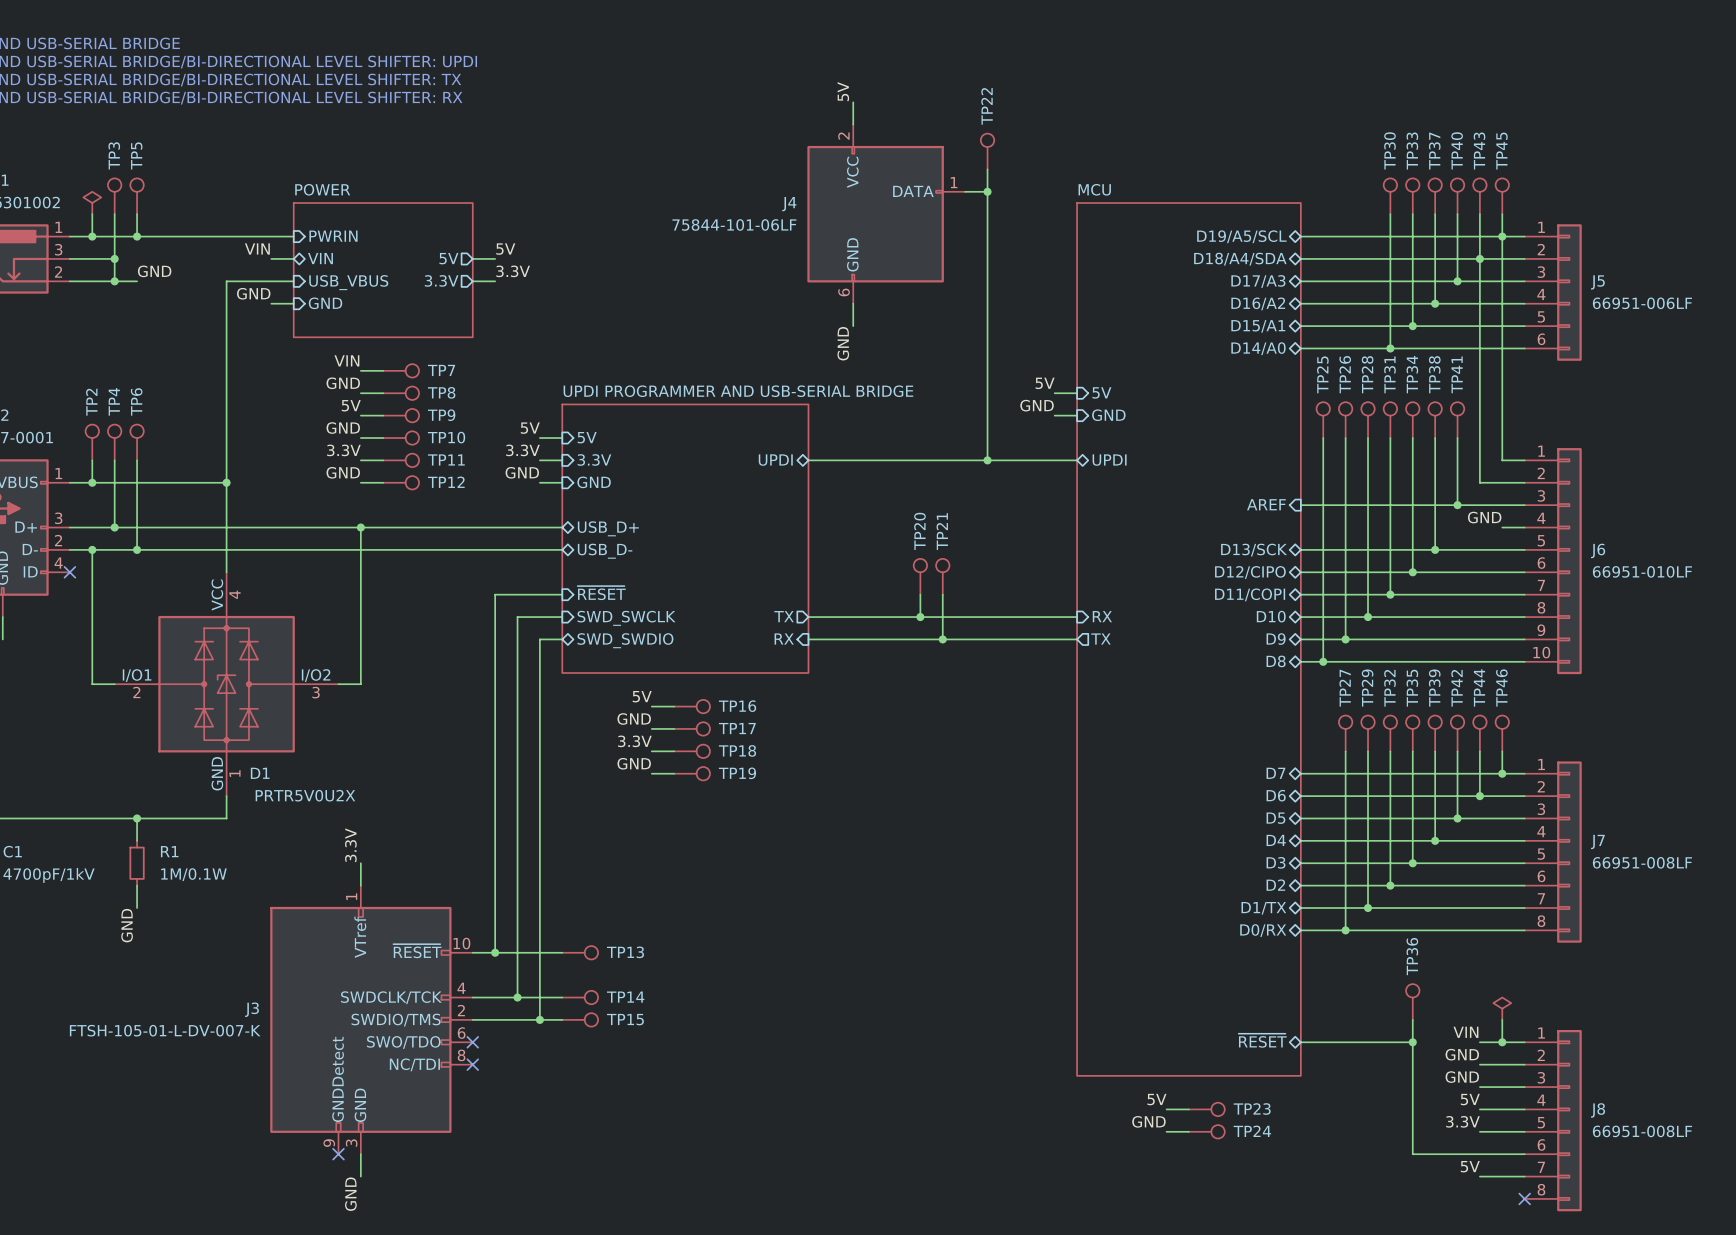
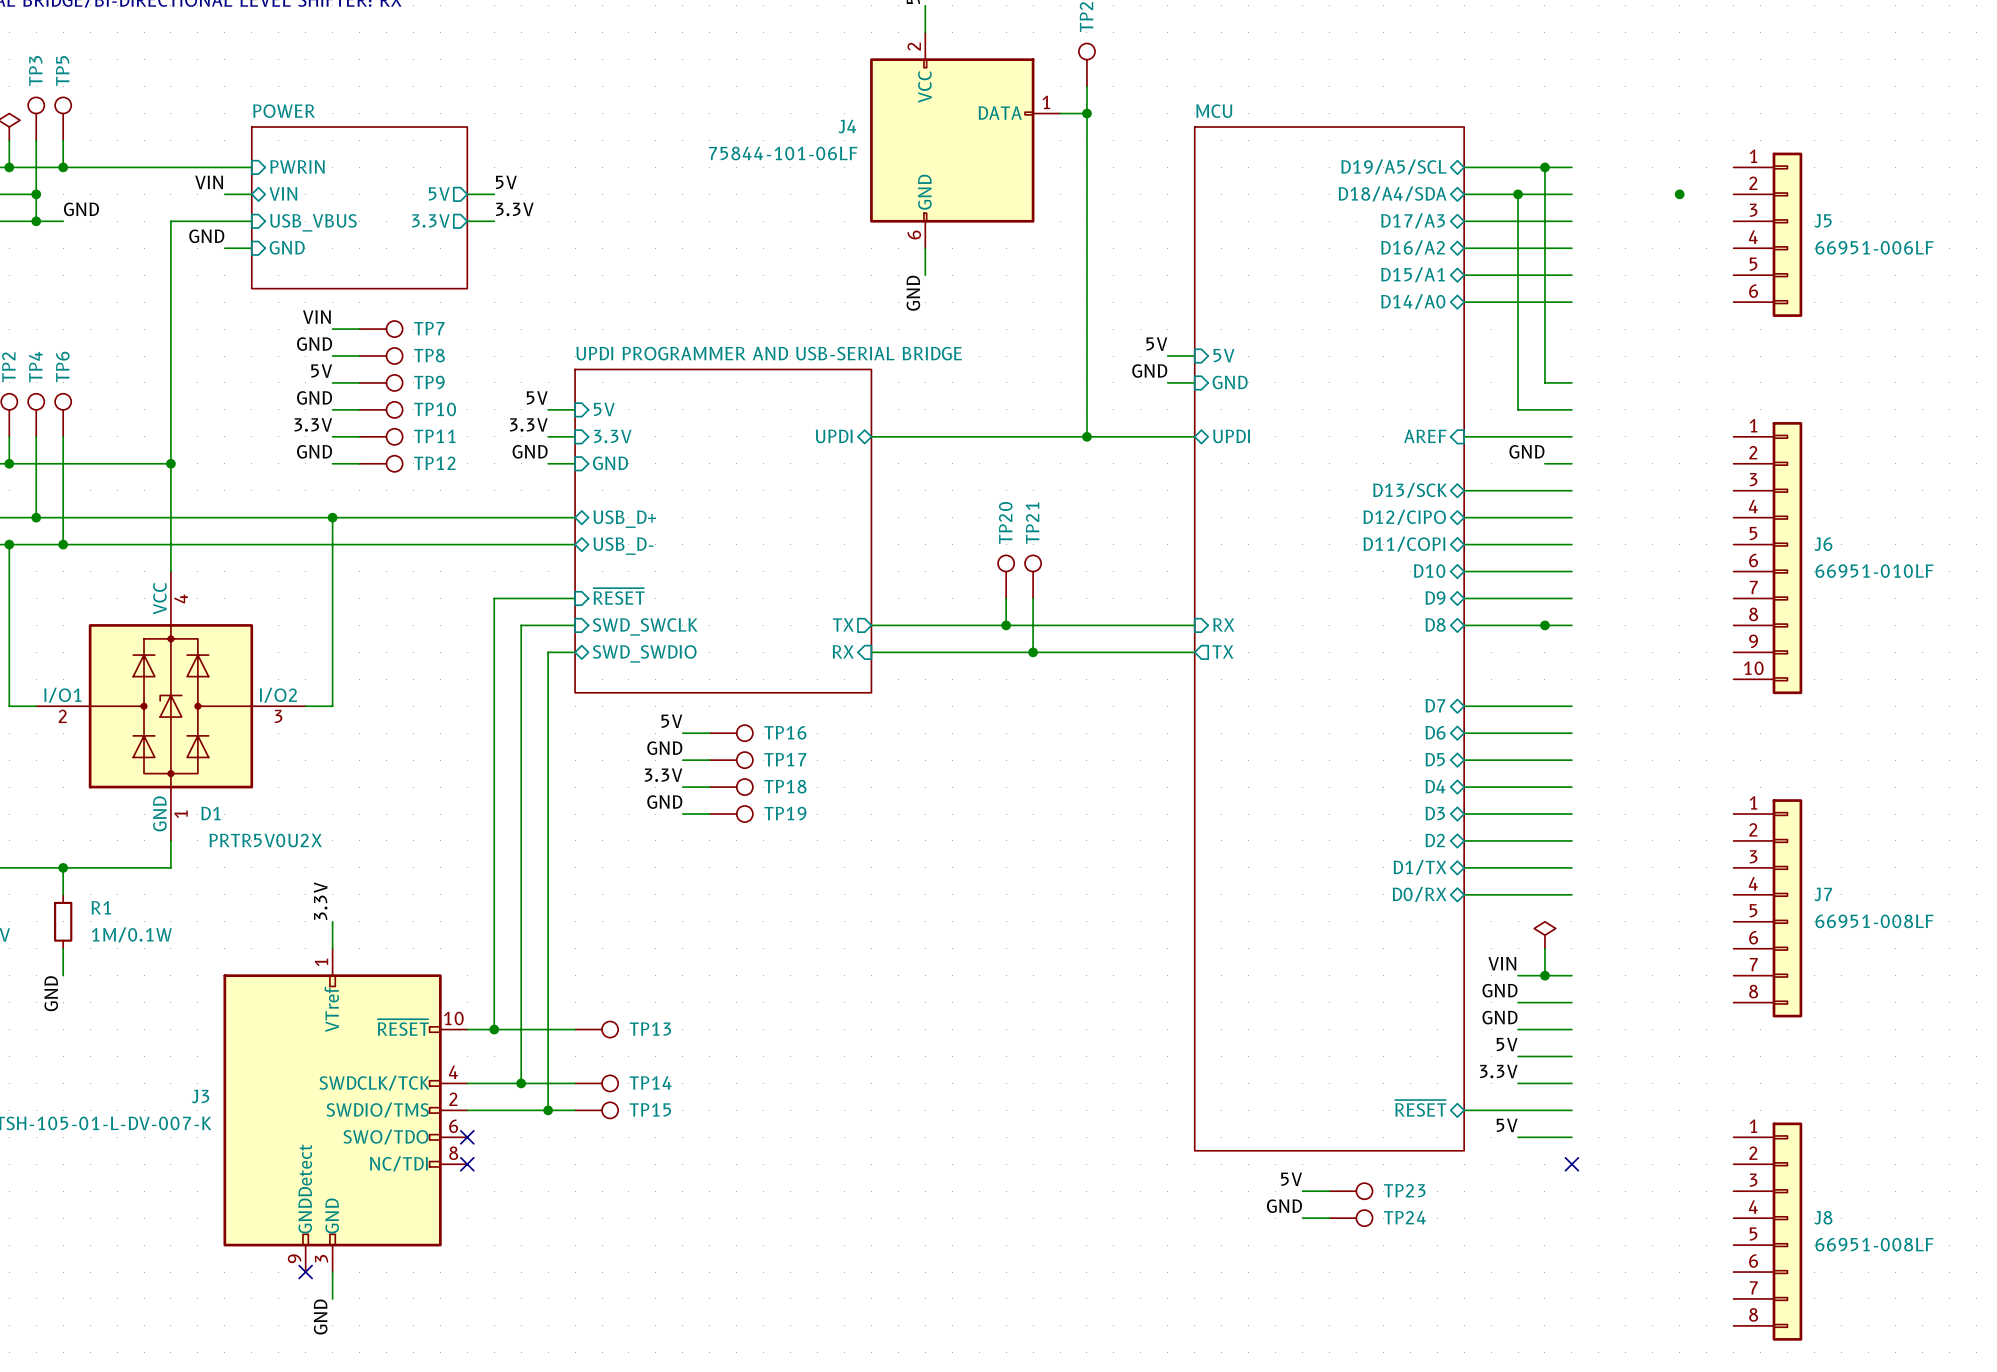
TP30: (1390, 196) -> none
TP33: (1412, 196) -> none
TP37: (1435, 196) -> none
TP40: (1457, 196) -> none
TP43: (1479, 196) -> none
TP45: (1502, 196) -> none
wire: (1390, 214) (1390, 348) (1524, 348) -> none
wire: (1412, 214) (1412, 326) -> none
wire: (1435, 214) (1435, 303) -> none
wire: (1457, 214) (1457, 281) -> none
wire: (1479, 214) (1479, 482) (1524, 482) -> none
wire: (1502, 214) (1502, 460) (1524, 460) -> none
wire: none -> (1544, 167) (1544, 382) (1571, 382)
junction: none -> (1544, 167)
wire: (1390, 236) (1524, 236) -> none
junction: (1502, 236) -> none
junction: none -> (1518, 194)
wire: (1390, 258) (1524, 258) -> none
wire: (1390, 281) (1524, 281) -> none
junction: (1457, 281) -> none
wire: (1390, 303) (1524, 303) -> none
junction: (1435, 303) -> none
wire: (1390, 326) (1524, 326) -> none
junction: (1412, 326) -> none
junction: (1390, 348) -> none
TP25: (1323, 420) -> none
TP26: (1345, 420) -> none
TP28: (1368, 420) -> none
TP31: (1390, 420) -> none
TP34: (1412, 420) -> none
TP38: (1435, 420) -> none
TP41: (1457, 420) -> none
wire: (1323, 438) (1323, 661) -> none
wire: (1345, 438) (1345, 639) -> none
wire: (1368, 438) (1368, 617) -> none
wire: (1390, 438) (1390, 594) (1524, 594) -> (1571, 409) (1518, 409) (1518, 194)
wire: (1412, 438) (1412, 572) -> none
wire: (1435, 438) (1435, 549) -> none
wire: (1457, 438) (1457, 505) -> none
sheet pin: none -> AREF (1425, 436)
wire: none -> (1464, 436) (1571, 436)
sheet pin shape: input (1266, 504) -> bidirectional (1410, 490)
sheet pin: AREF (1266, 504) -> D13/SCK (1410, 490)
wire: (1390, 505) (1524, 505) -> none
junction: (1457, 505) -> none
label position: GND (1484, 517) -> GND (1526, 451)
sheet pin: none -> D12/CIPO (1404, 517)
wire: none -> (1464, 517) (1571, 517)
wire: (1502, 527) (1524, 527) -> (1544, 463) (1571, 463)
wire: (1390, 549) (1524, 549) -> none
junction: (1435, 549) -> none
sheet pin: D13/SCK (1254, 550) -> D11/COPI (1404, 544)
sheet pin: D12/CIPO (1250, 572) -> D10 (1429, 571)
wire: (1390, 572) (1524, 572) -> none
junction: (1412, 572) -> none
sheet pin: D11/COPI (1250, 594) -> D9 (1435, 598)
junction: (1390, 594) -> none
sheet pin: D10 (1271, 616) -> D8 (1435, 625)
wire: (1390, 617) (1524, 617) -> none
sheet MCU: none -> (1329, 638)
sheet MCU: (1188, 639) -> none
sheet pin: D9 (1276, 639) -> none
wire: (1300, 639) (1524, 639) -> none
junction: (1345, 639) -> none
sheet pin: D8 (1276, 661) -> none
wire: (1300, 661) (1524, 661) -> none
junction: (1323, 661) -> none
sheet pin: none -> D7 (1435, 705)
wire: none -> (1464, 706) (1571, 706)
sheet pin: none -> D6 (1435, 732)
wire: none -> (1464, 733) (1571, 733)
sheet pin: none -> D5 (1435, 759)
wire: none -> (1464, 760) (1571, 760)
TP27: (1345, 733) -> none
TP29: (1368, 733) -> none
TP32: (1390, 733) -> none
TP35: (1412, 733) -> none
TP39: (1435, 733) -> none
TP42: (1457, 733) -> none
TP44: (1479, 733) -> none
TP46: (1502, 733) -> none
sheet pin: none -> D4 (1435, 786)
wire: (1345, 751) (1345, 930) (1300, 930) -> none
wire: (1368, 751) (1368, 885) -> none
wire: (1390, 751) (1390, 885) -> (1571, 787) (1464, 787)
wire: (1412, 751) (1412, 863) -> none
wire: (1435, 751) (1435, 840) -> none
wire: (1457, 751) (1457, 818) -> none
wire: (1479, 751) (1479, 796) -> none
wire: (1502, 751) (1502, 773) -> none
sheet pin: D7 (1275, 773) -> D3 (1435, 813)
wire: (1390, 773) (1524, 773) -> none
junction: (1502, 773) -> none
sheet pin: D6 (1276, 795) -> D2 (1435, 840)
wire: (1390, 796) (1524, 796) -> none
junction: (1479, 796) -> none
sheet pin: D5 (1275, 818) -> D1/TX (1420, 867)
wire: (1390, 818) (1524, 818) -> none
junction: (1457, 818) -> none
sheet pin: D4 (1276, 840) -> D0/RX (1419, 894)
wire: (1390, 840) (1524, 840) -> none
junction: (1435, 840) -> none
sheet pin: D3 (1275, 862) -> none
wire: (1300, 863) (1524, 863) -> none
junction: (1412, 863) -> none
sheet pin: D2 (1275, 885) -> none
wire: (1300, 885) (1524, 885) -> none
junction: (1390, 885) -> none
sheet pin: D1/TX (1263, 908) -> none
wire: (1300, 908) (1345, 908) -> none
wire: (1390, 908) (1524, 908) -> none
label: none -> GND (1499, 990)
sheet pin: D0/RX (1263, 930) -> none
junction: (1345, 930) -> none
wire: (1390, 930) (1524, 930) -> none
label: none -> GND (1499, 1017)
label: none -> 5V (1507, 1044)
TP36: (1412, 1002) -> none
power symbol position: (1502, 1008) -> (1544, 935)
wire: none -> (1464, 1110) (1571, 1110)
wire: (1412, 1019) (1412, 1154) (1524, 1154) -> none
wire: (1502, 1019) (1502, 1042) -> none
label: none -> 5V (1507, 1125)
label position: VIN (1465, 1032) -> VIN (1502, 963)
sheet pin position: ~{RESET} (1262, 1040) -> ~{RESET} (1420, 1108)
wire: (1300, 1042) (1345, 1042) -> none
wire: (1390, 1042) (1412, 1042) -> none
junction: (1412, 1042) -> none
wire: (1479, 1042) (1524, 1042) -> (1518, 1029) (1571, 1029)
junction: (1502, 1042) -> none
label: GND (1462, 1054) -> none
no-connect mark: none -> (1571, 1164)
wire: (1479, 1064) (1524, 1064) -> (1518, 1056) (1571, 1056)
label: none -> 5V (1291, 1179)
label: GND (1462, 1077) -> none
TP23: none -> (1350, 1191)
wire: (1479, 1087) (1524, 1087) -> (1518, 1083) (1571, 1083)
label: 5V (1156, 1099) -> GND (1284, 1206)
label: 5V (1470, 1099) -> none
TP23 name: TP23 (1252, 1109) -> TP24 (1404, 1217)
wire: (1479, 1109) (1524, 1109) -> none
label: GND (1148, 1121) -> none
label position: 3.3V (1462, 1121) -> 3.3V (1498, 1071)
wire: (1166, 1131) (1188, 1131) -> (1302, 1191) (1329, 1191)
TP24: (1206, 1131) -> none
wire: (1479, 1131) (1524, 1131) -> none
label: 5V (1470, 1166) -> none
wire: (1479, 1176) (1524, 1176) -> none
no-connect mark: (1524, 1198) -> none

